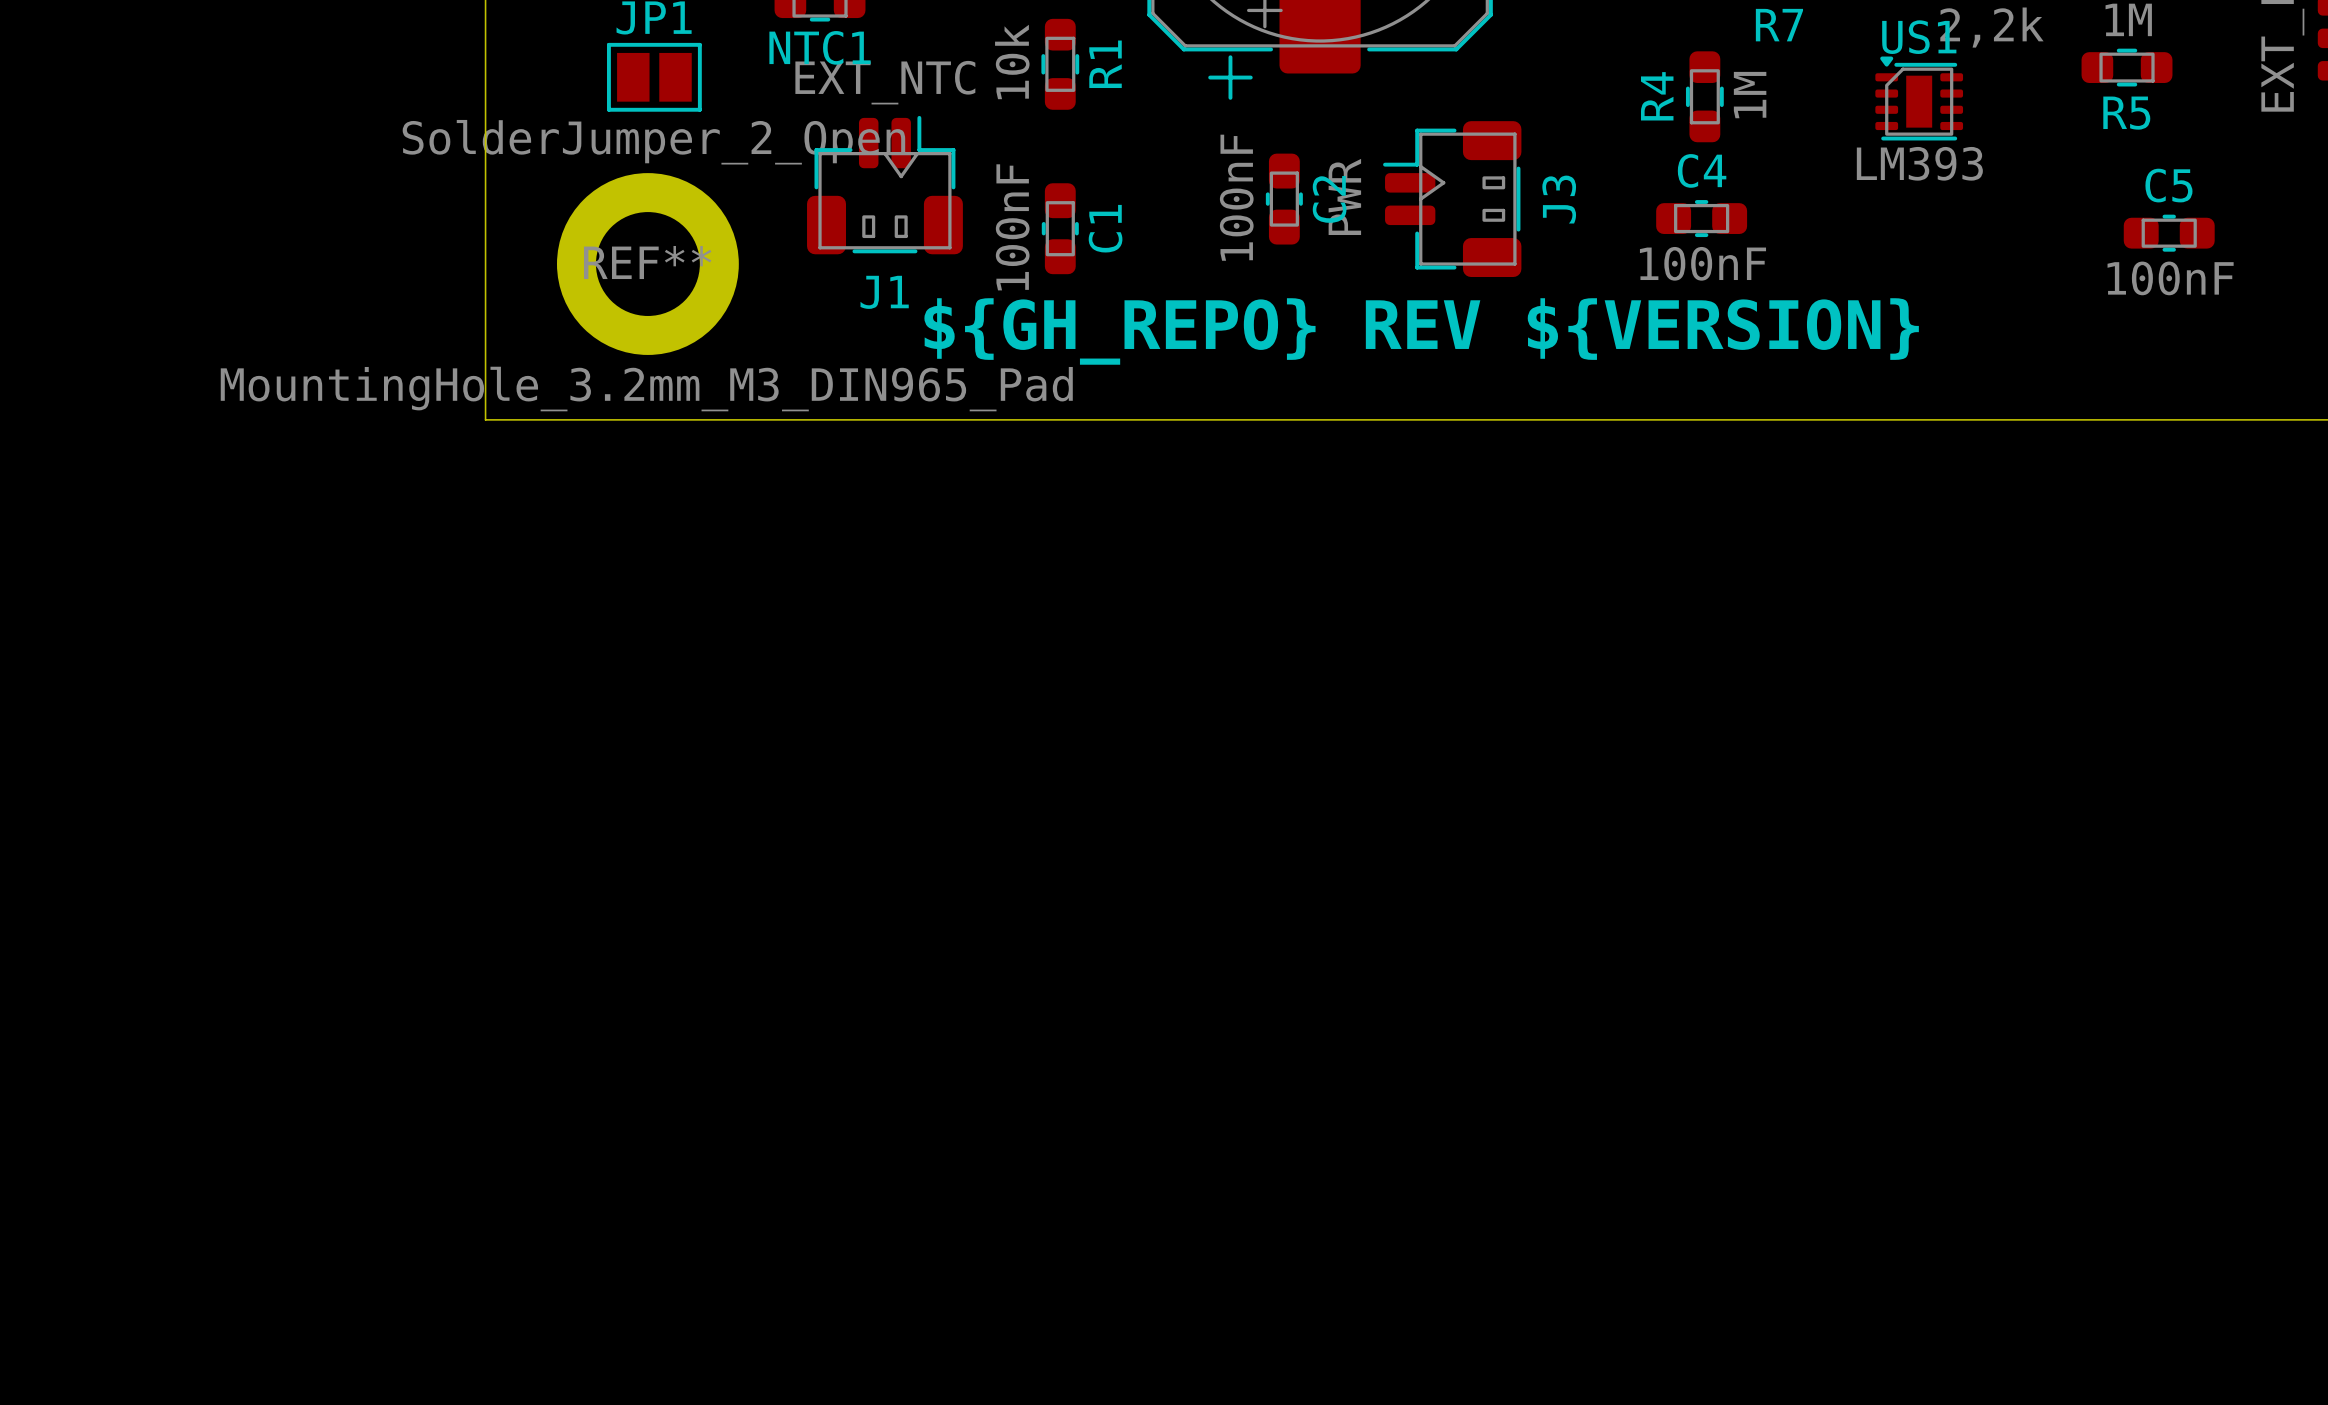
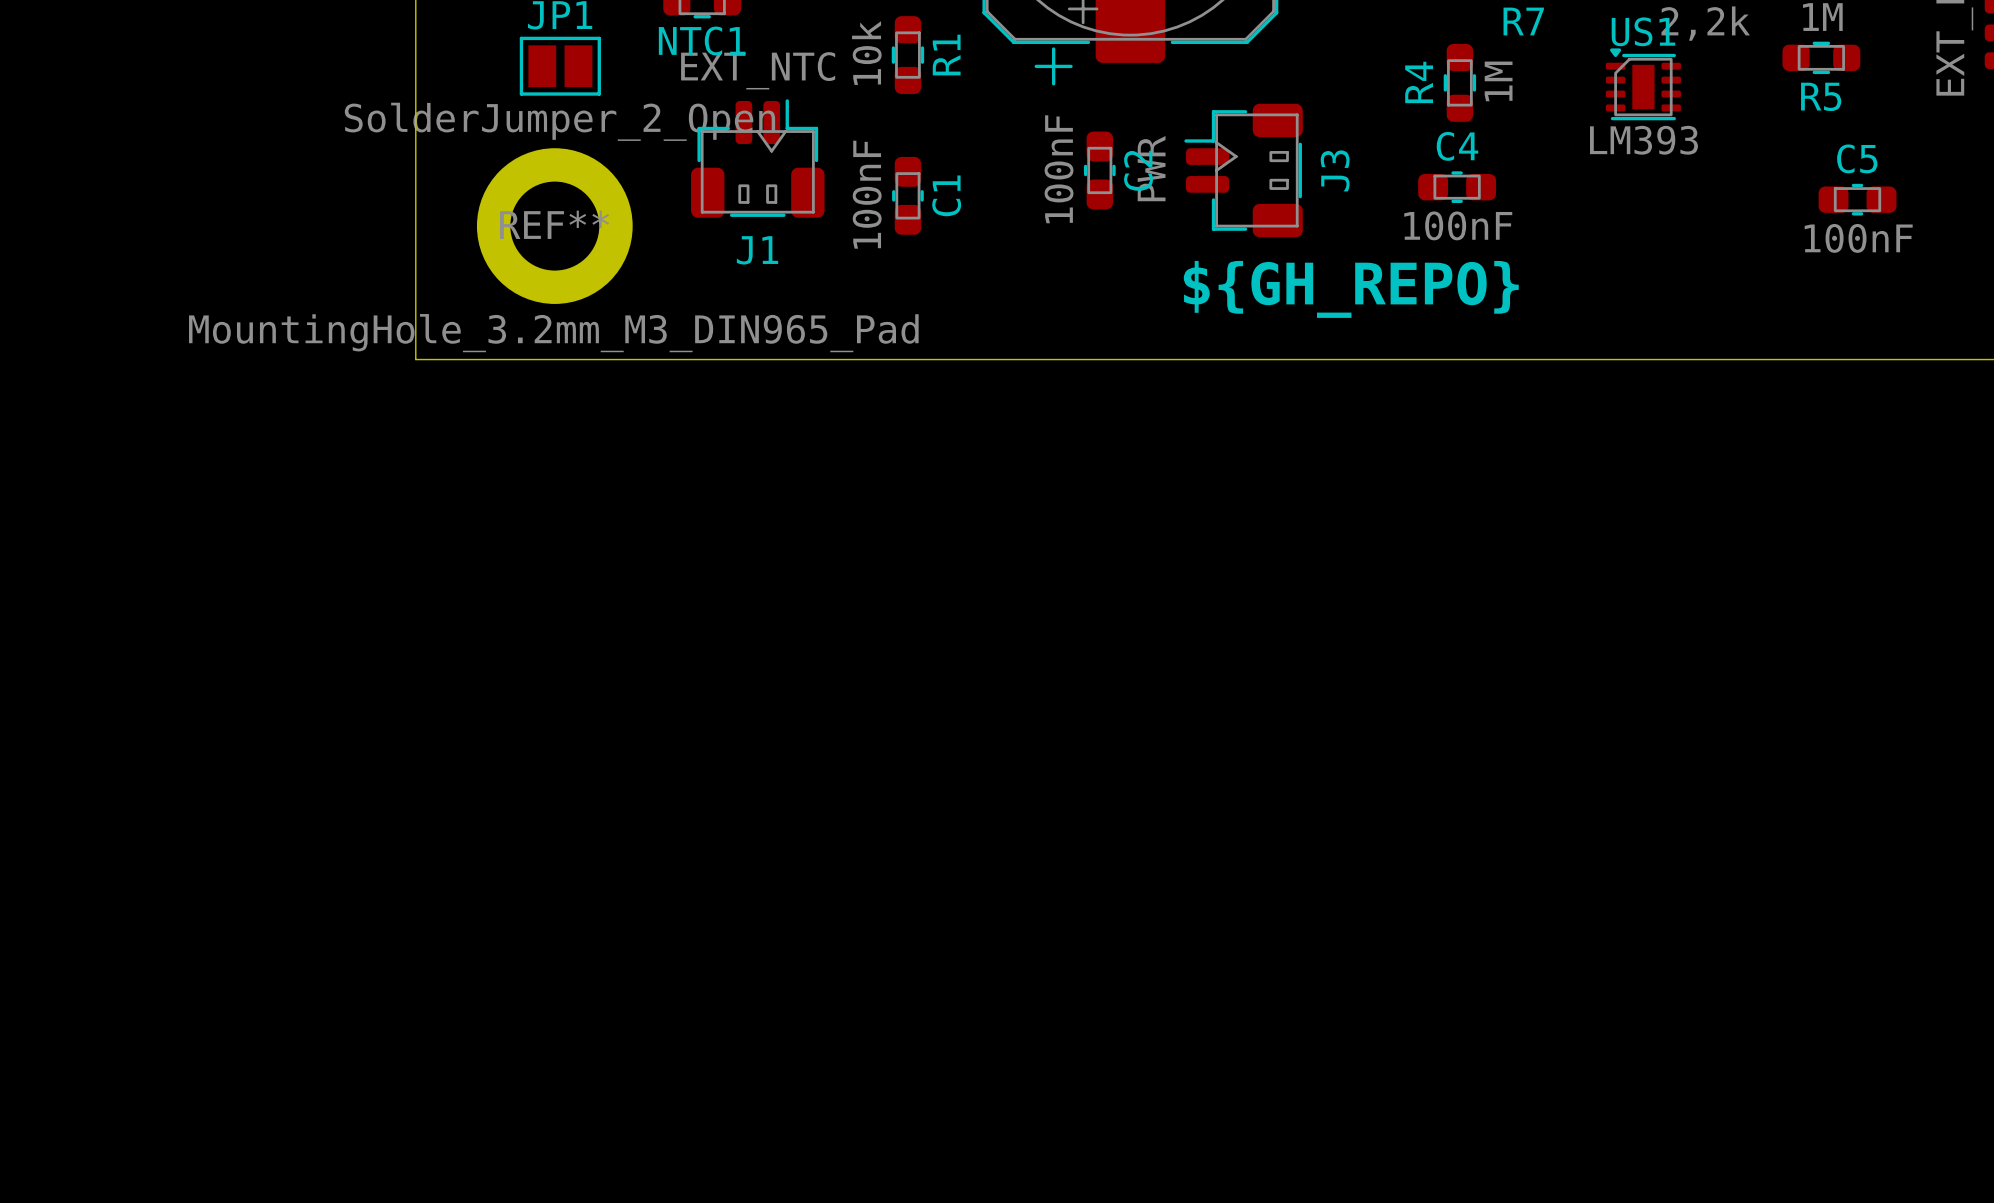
text: ${GH_REPO} REV ${VERSION} (1421, 331) -> none
text: none -> ${GH_REPO} (1351, 289)

